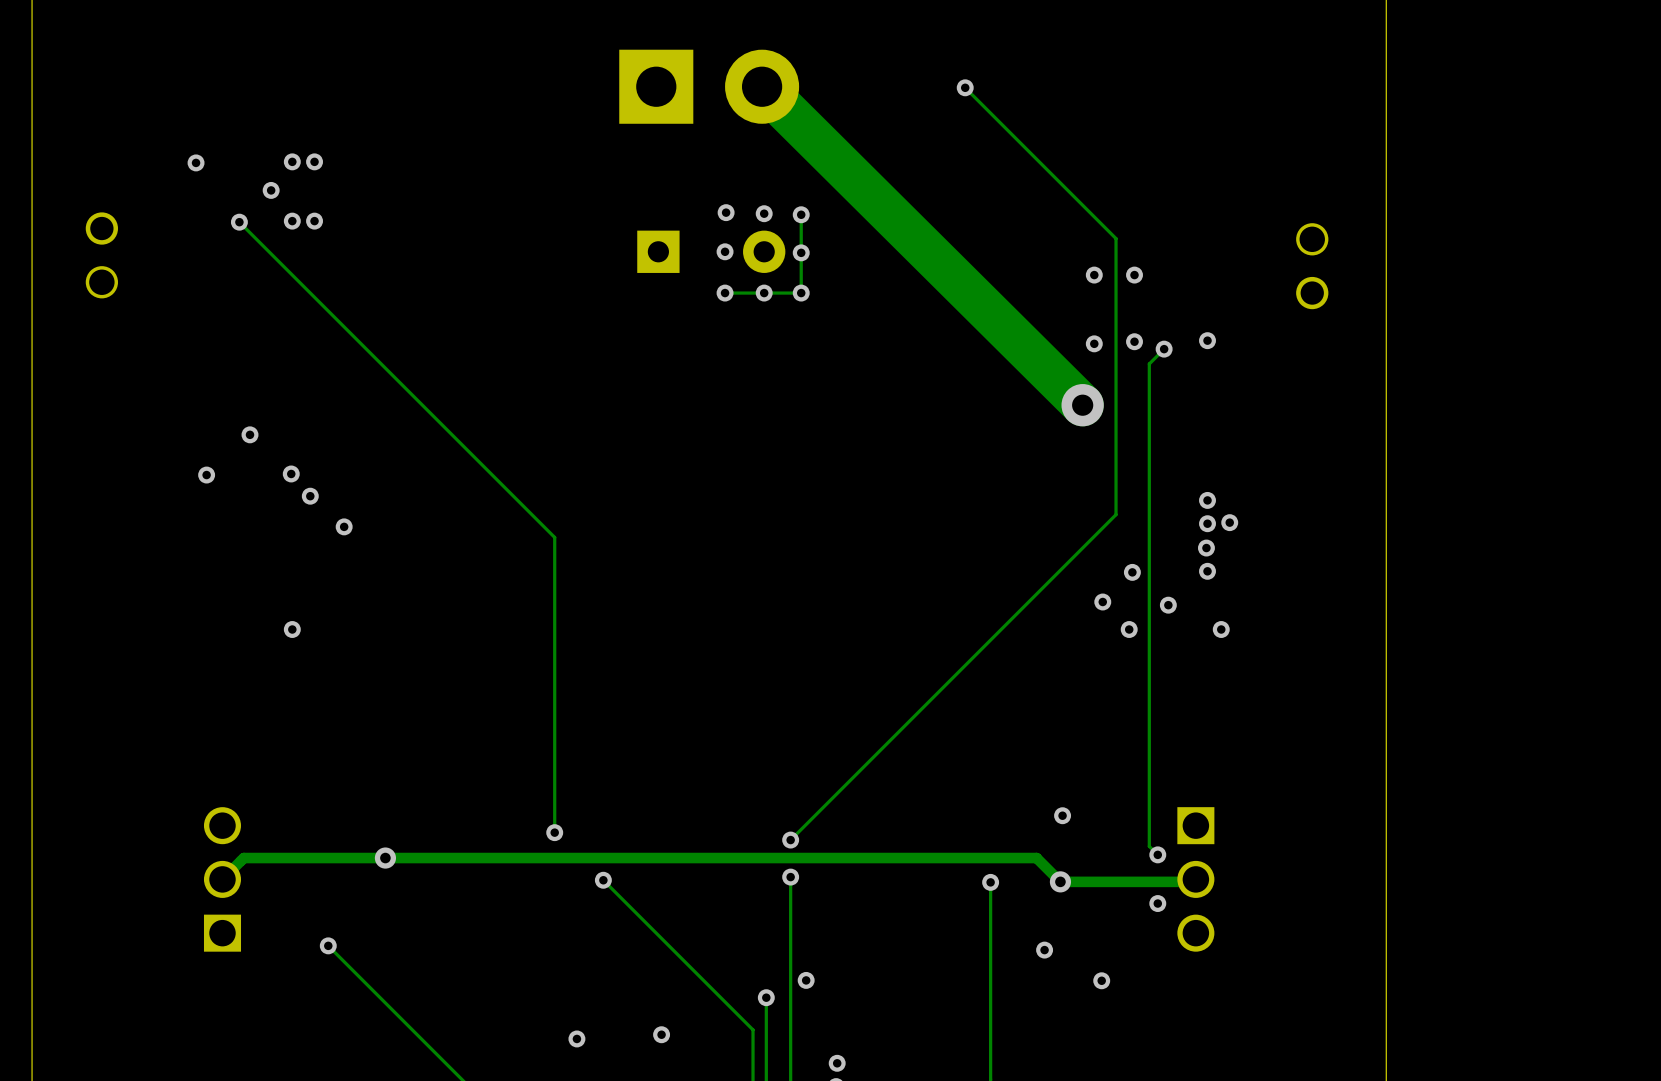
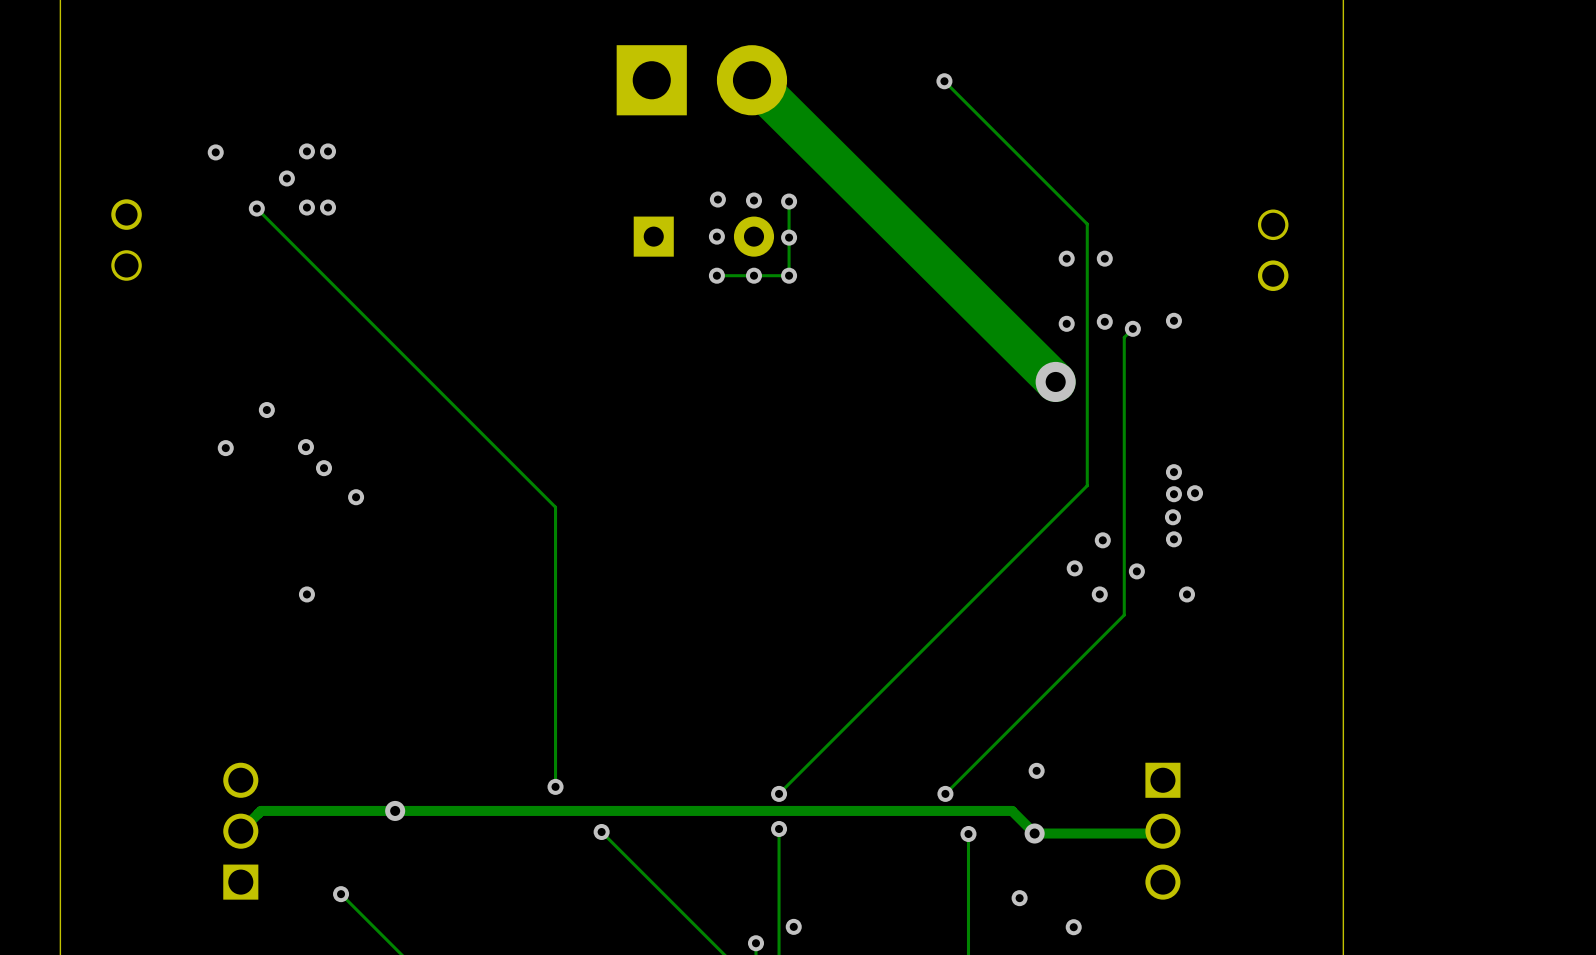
track: (1155, 358) (1149, 363) (1149, 846) (1157, 854) -> (1124, 337) (1124, 615) (945, 793)
via: none -> (945, 793)
via: (1157, 854) -> none
via: (1157, 903) -> none

